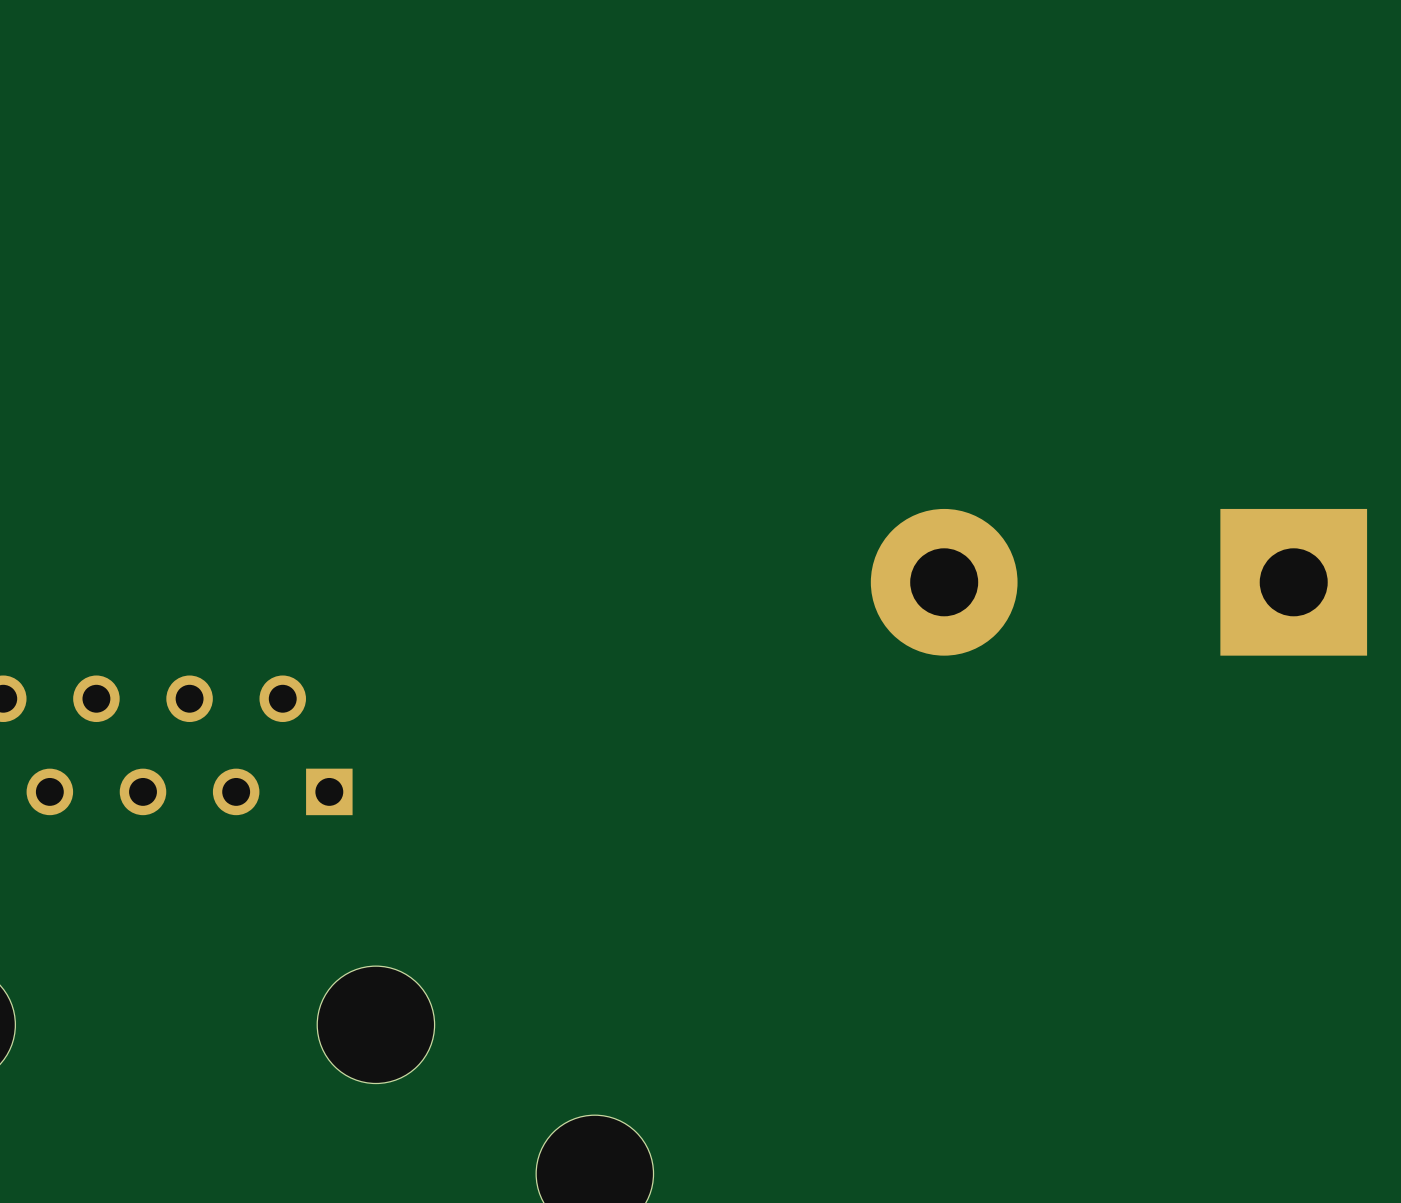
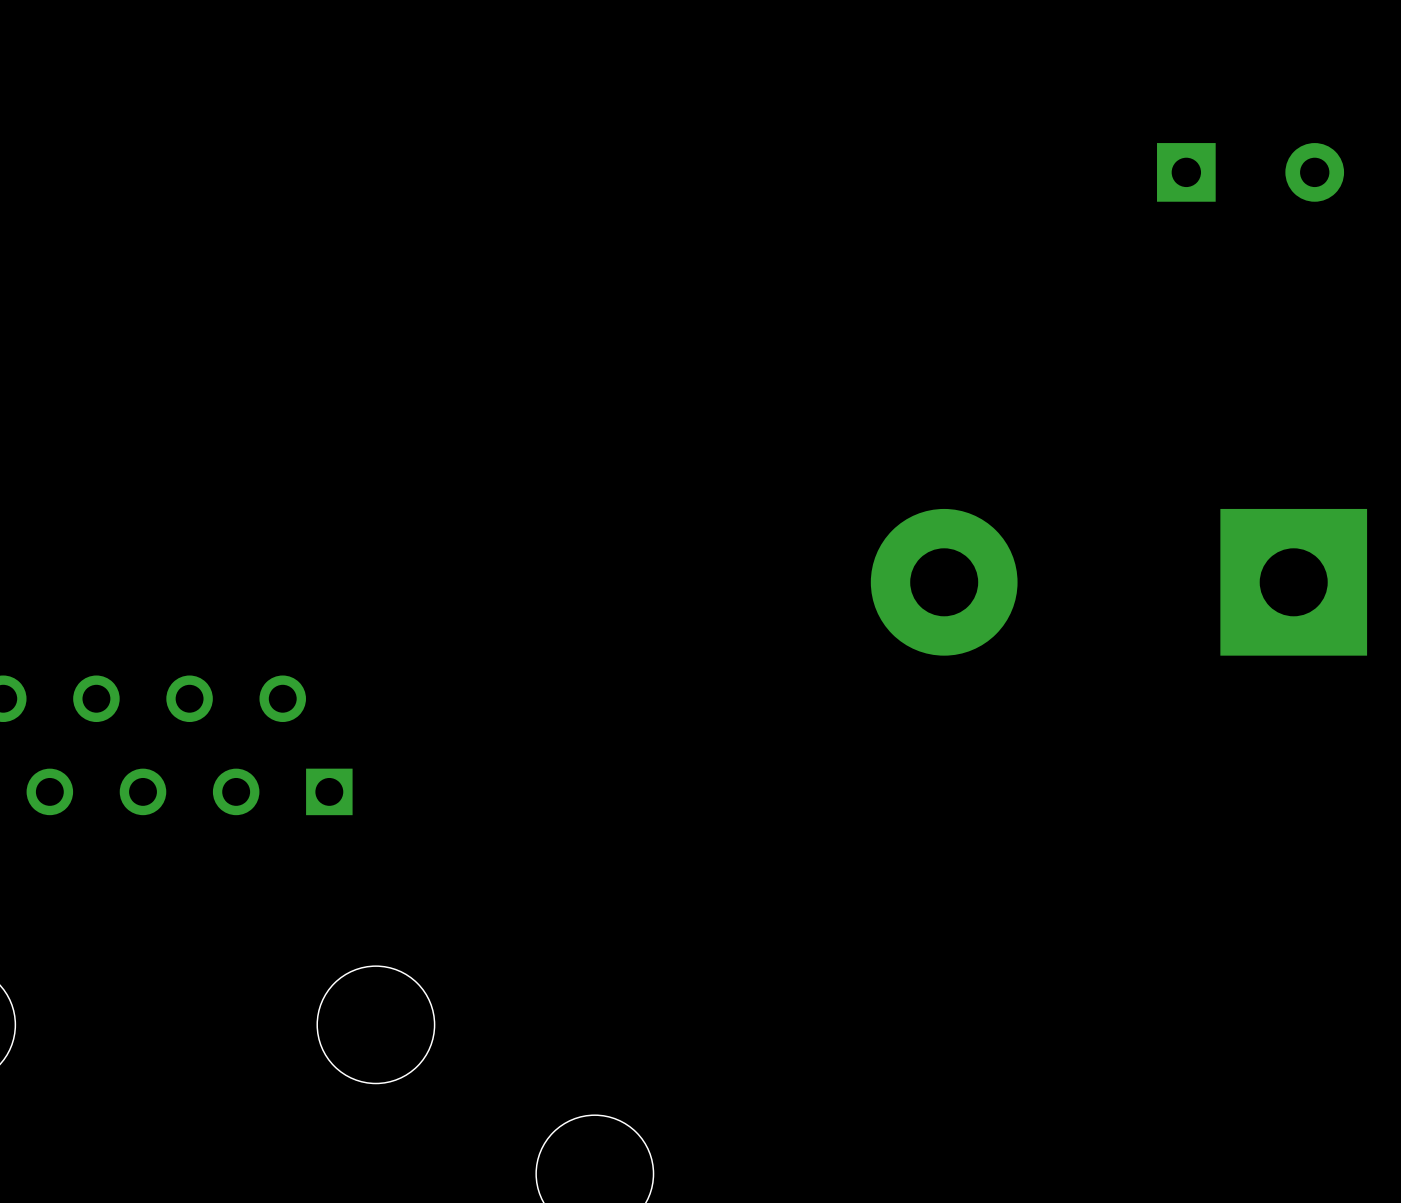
part: none -> (1250, 172)

